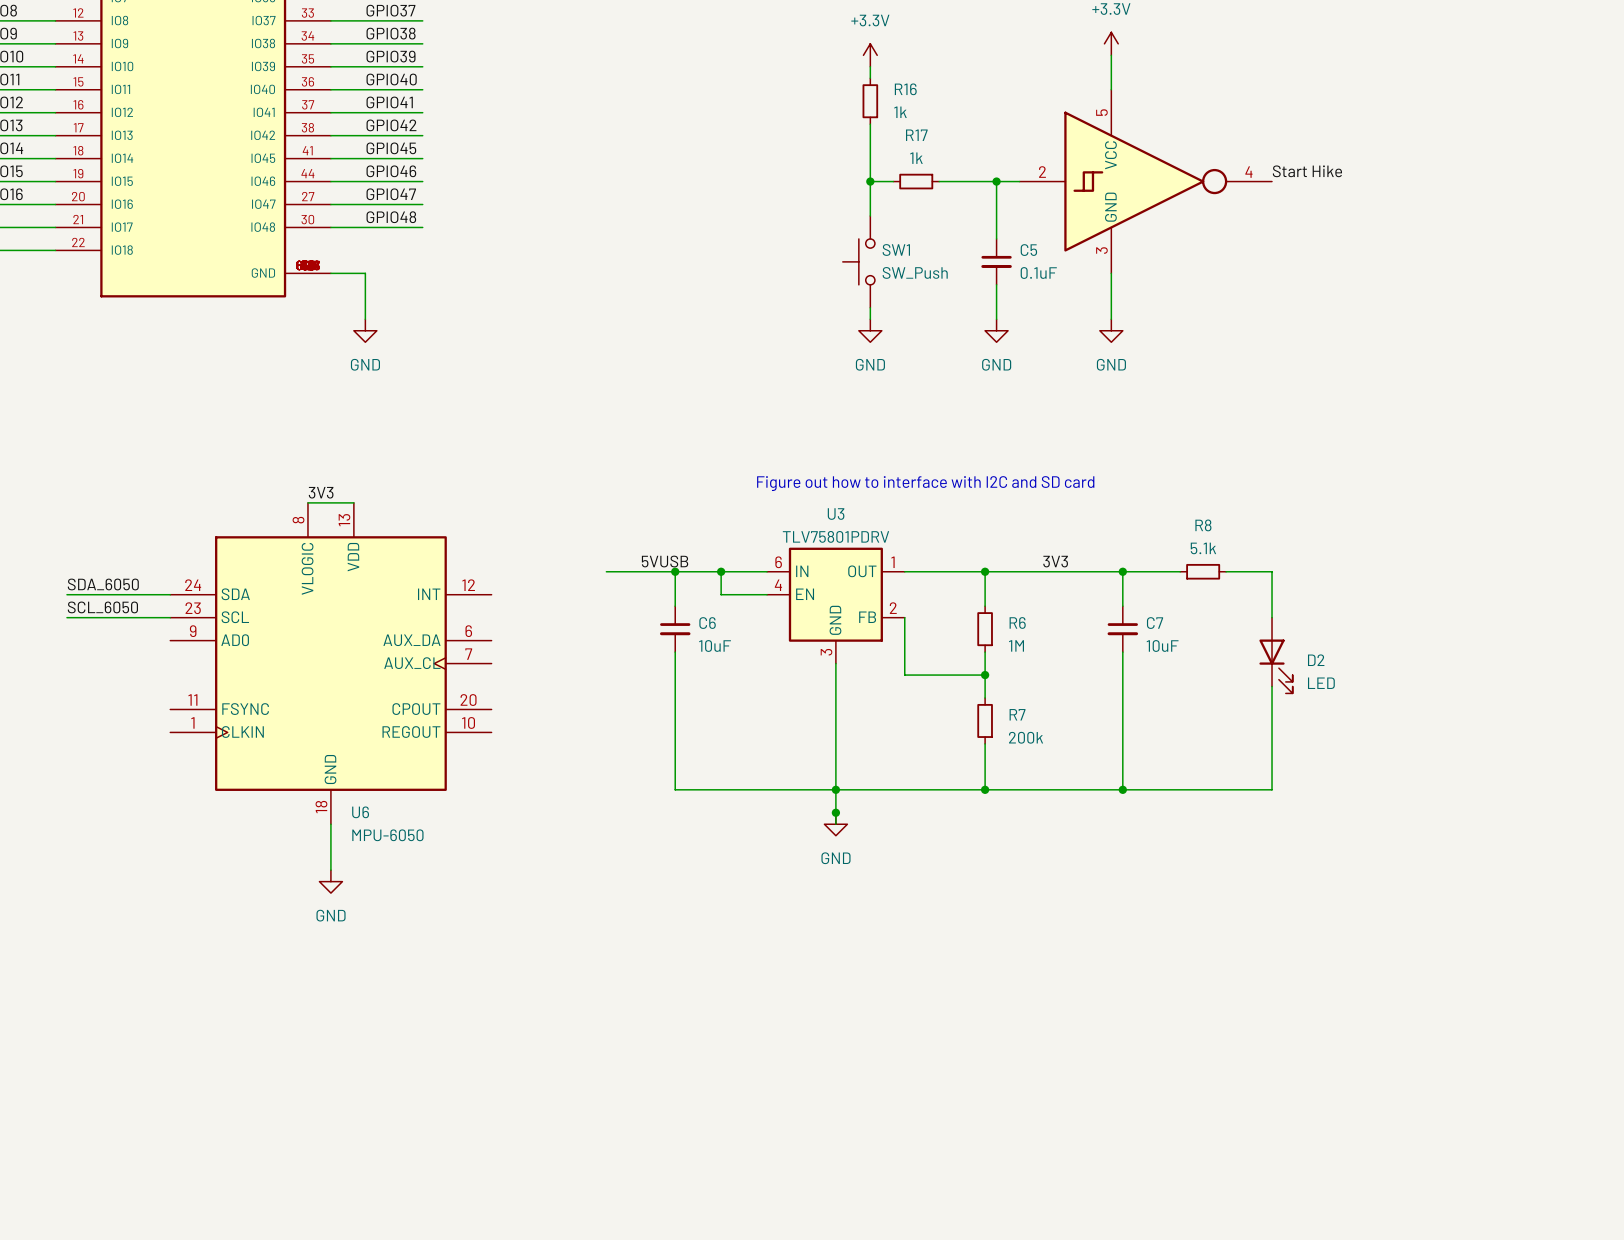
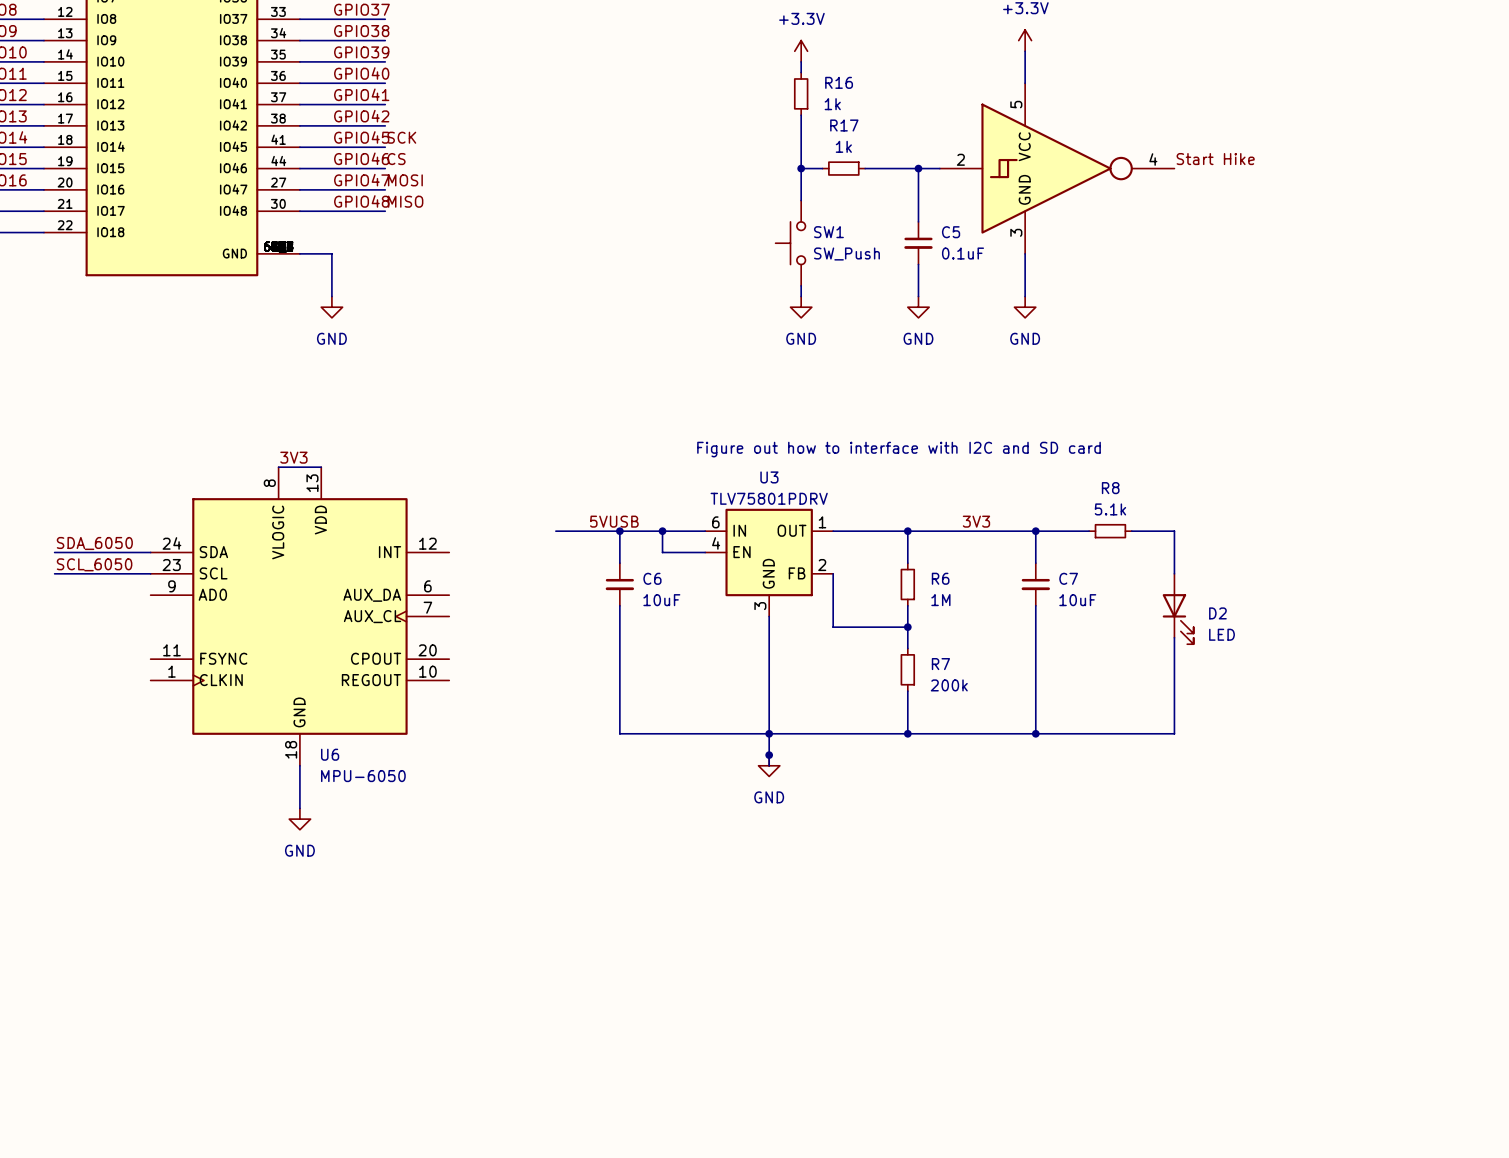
label: none -> SCK (401, 137)
label: none -> CS (396, 159)
label: none -> MOSI (405, 180)
label: none -> MISO (405, 201)

